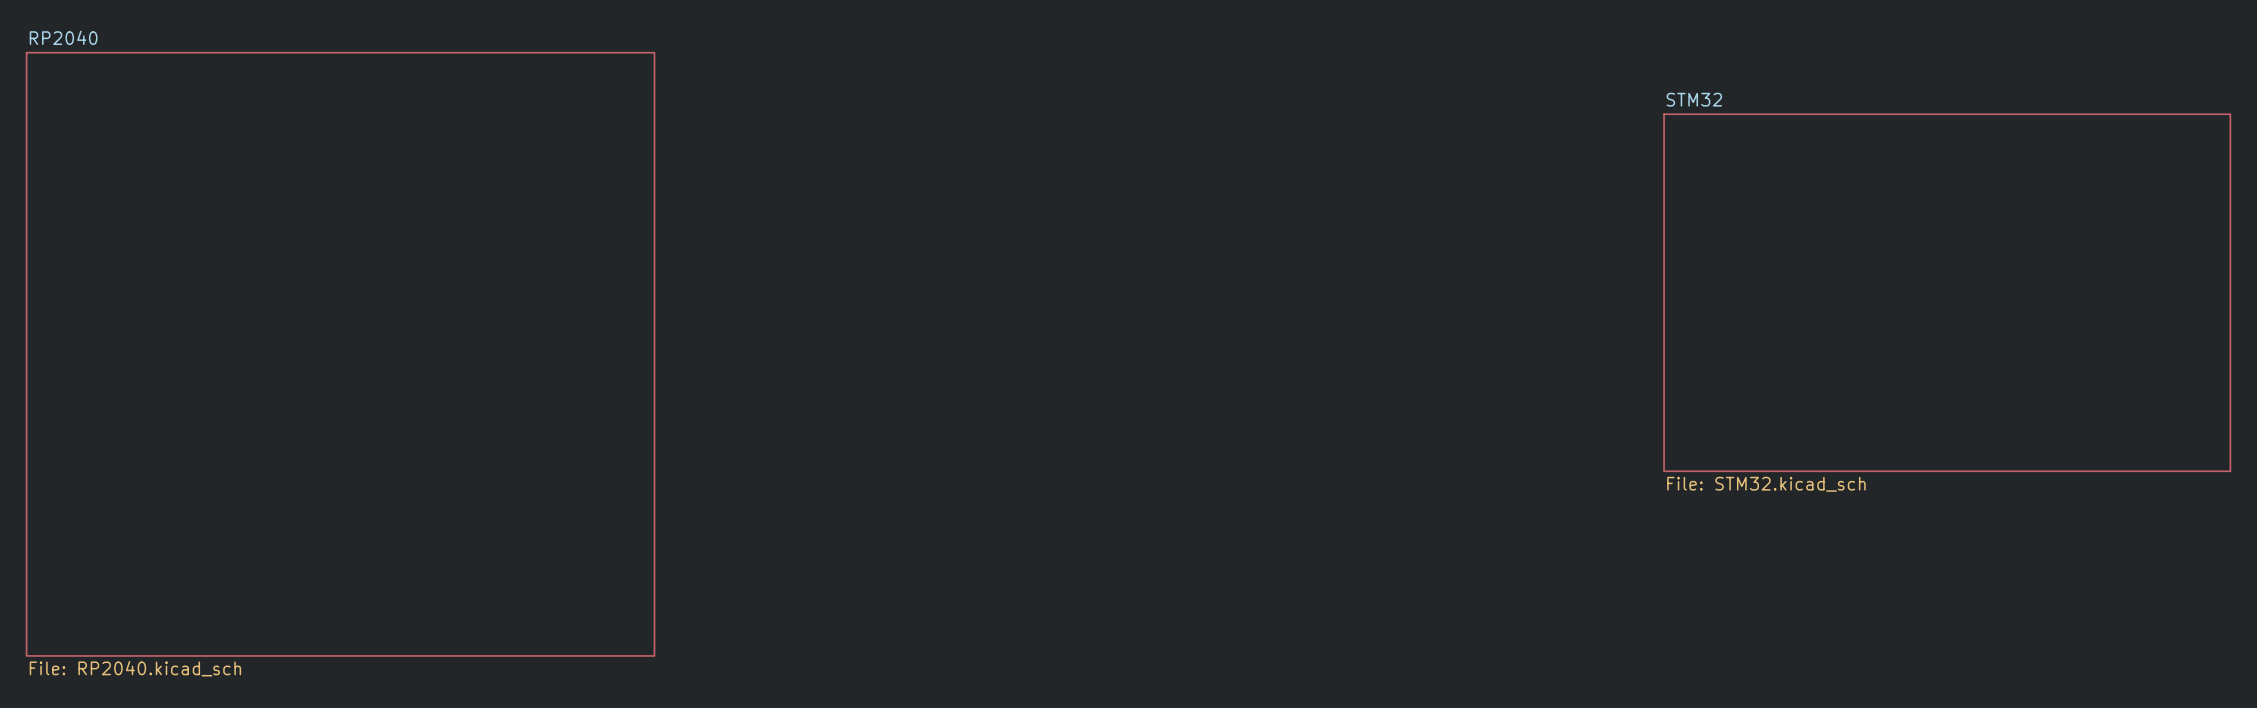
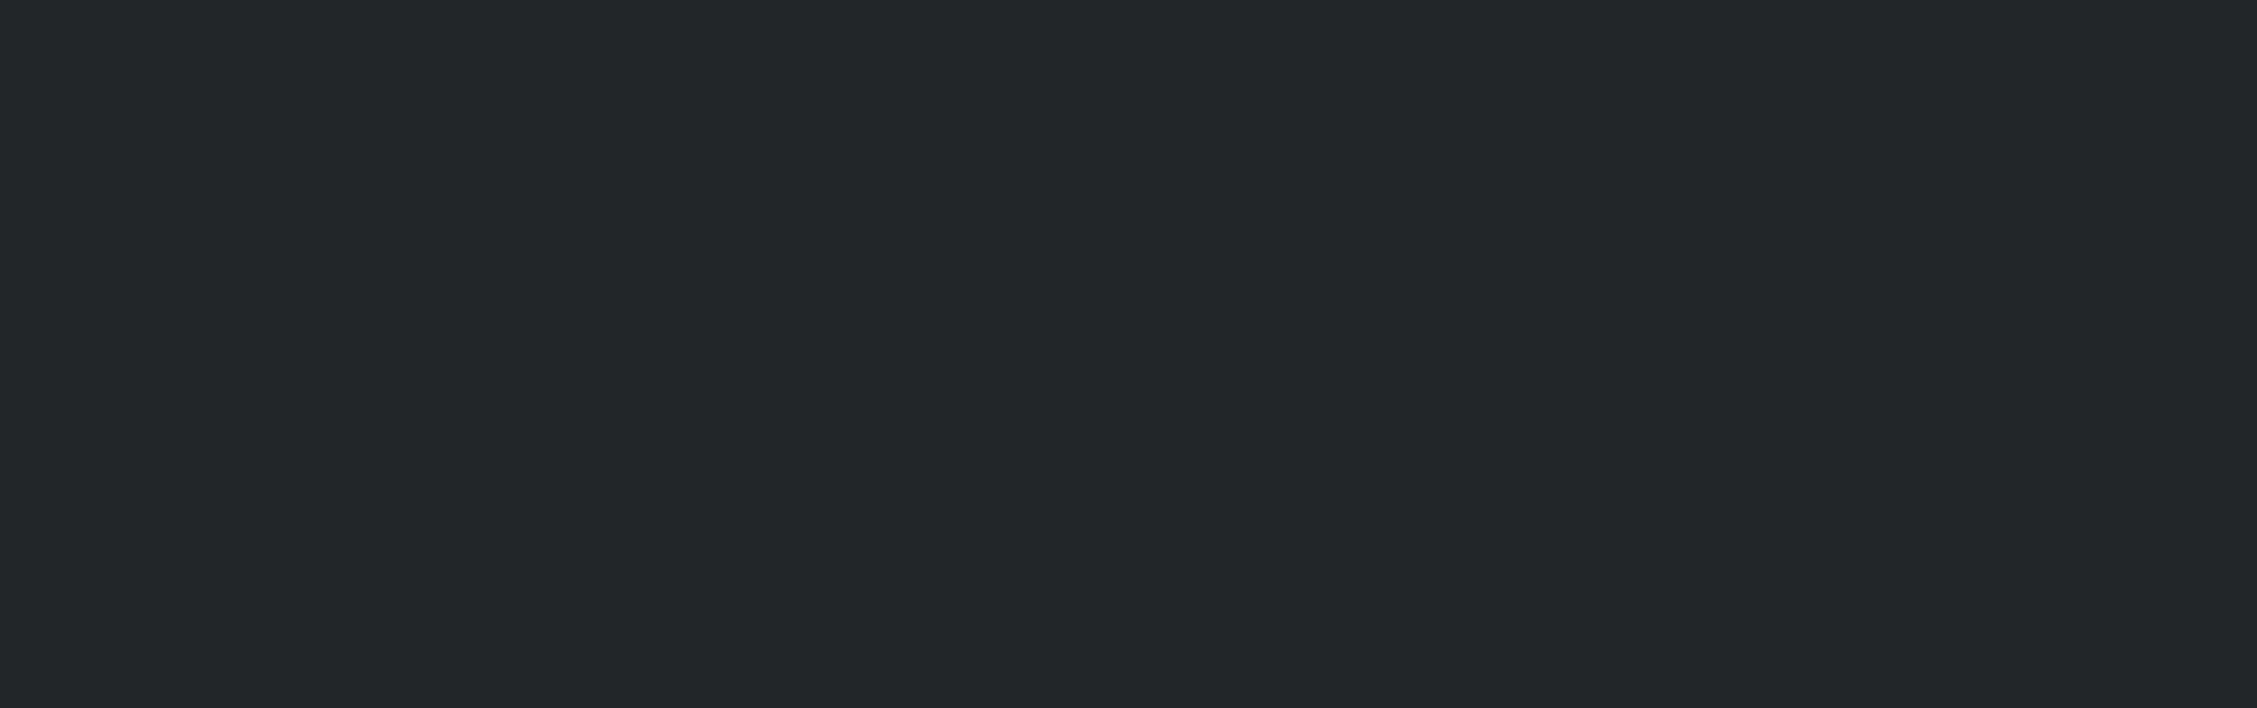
sheet STM32: File: STM32.kicad_sch (1947, 292) -> none
sheet RP2040: File: RP2040.kicad_sch (340, 354) -> none

